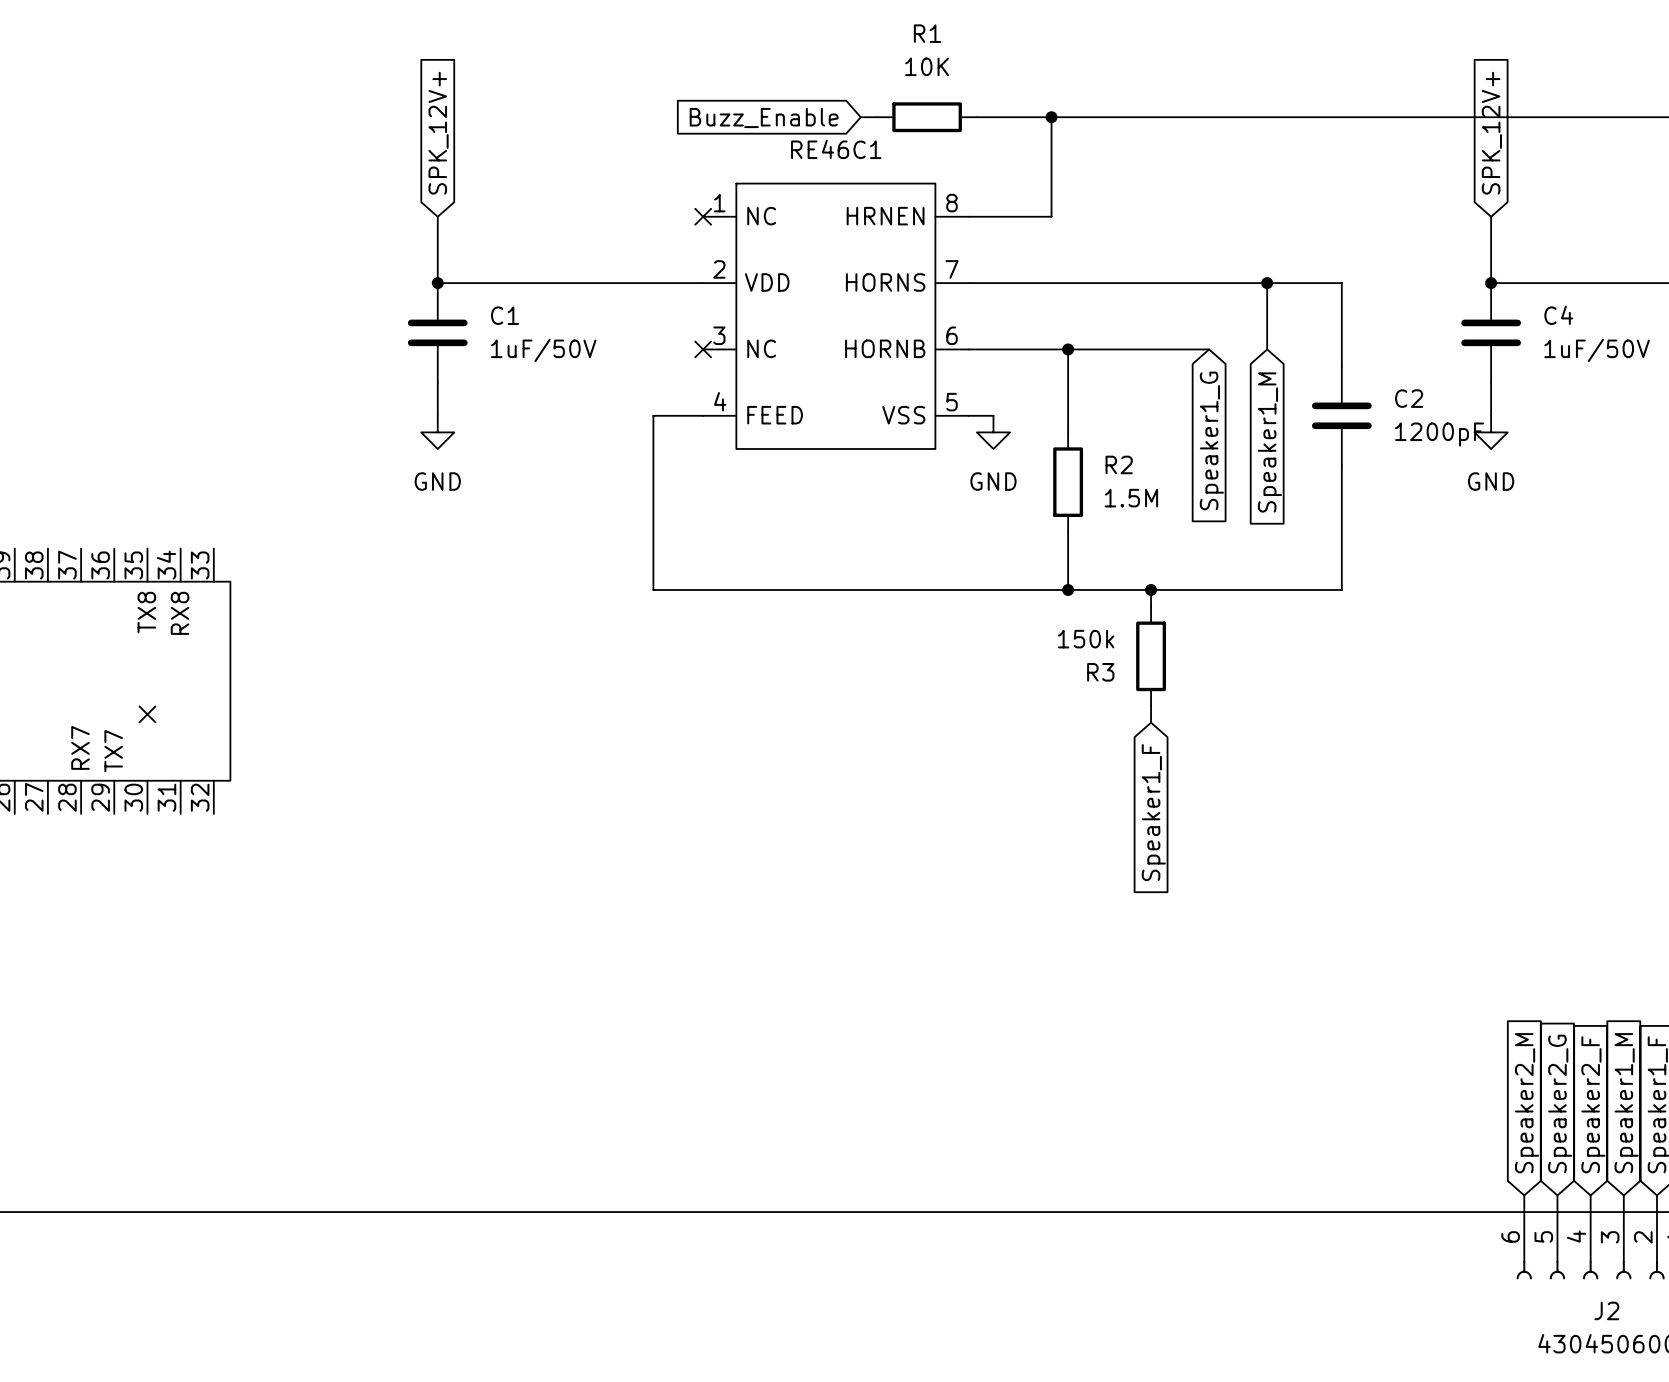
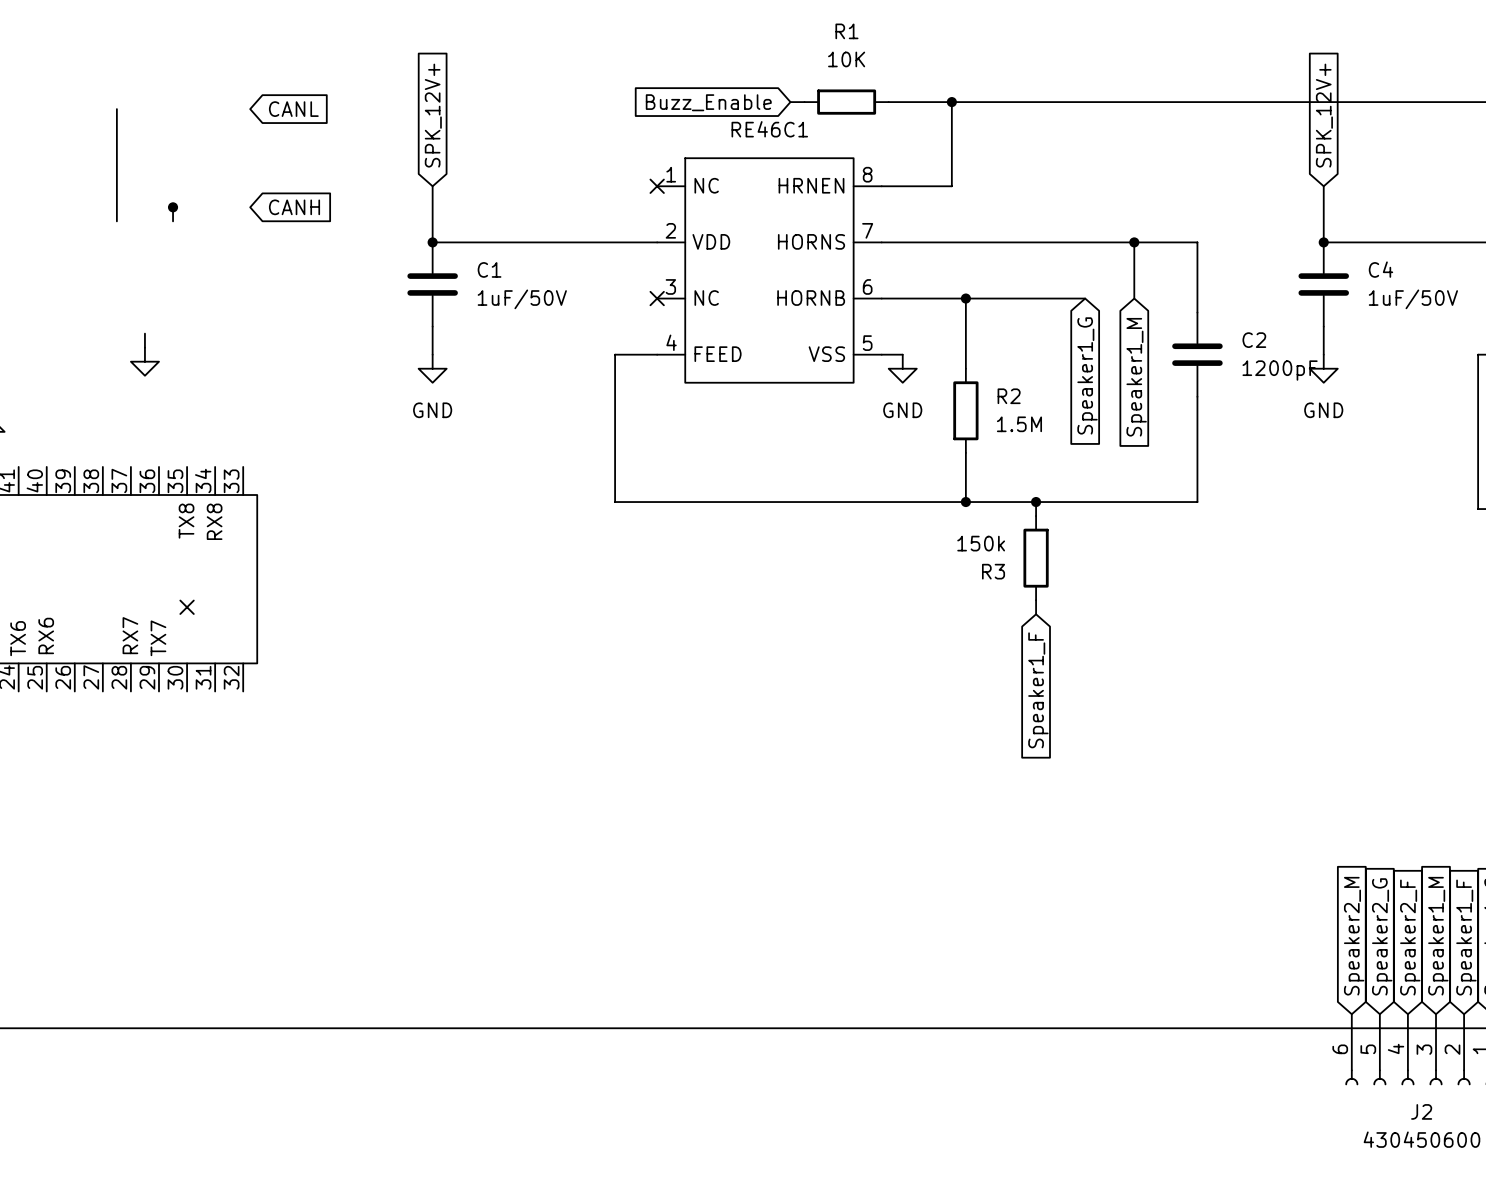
wire: none -> (116, 109) (116, 221)
global label: none -> CANL (293, 109)
wire: none -> (173, 207) (173, 221)
junction: none -> (173, 207)
global label: none -> CANH (294, 207)
wire: none -> (144, 333) (144, 347)
power symbol: none -> (144, 361)

